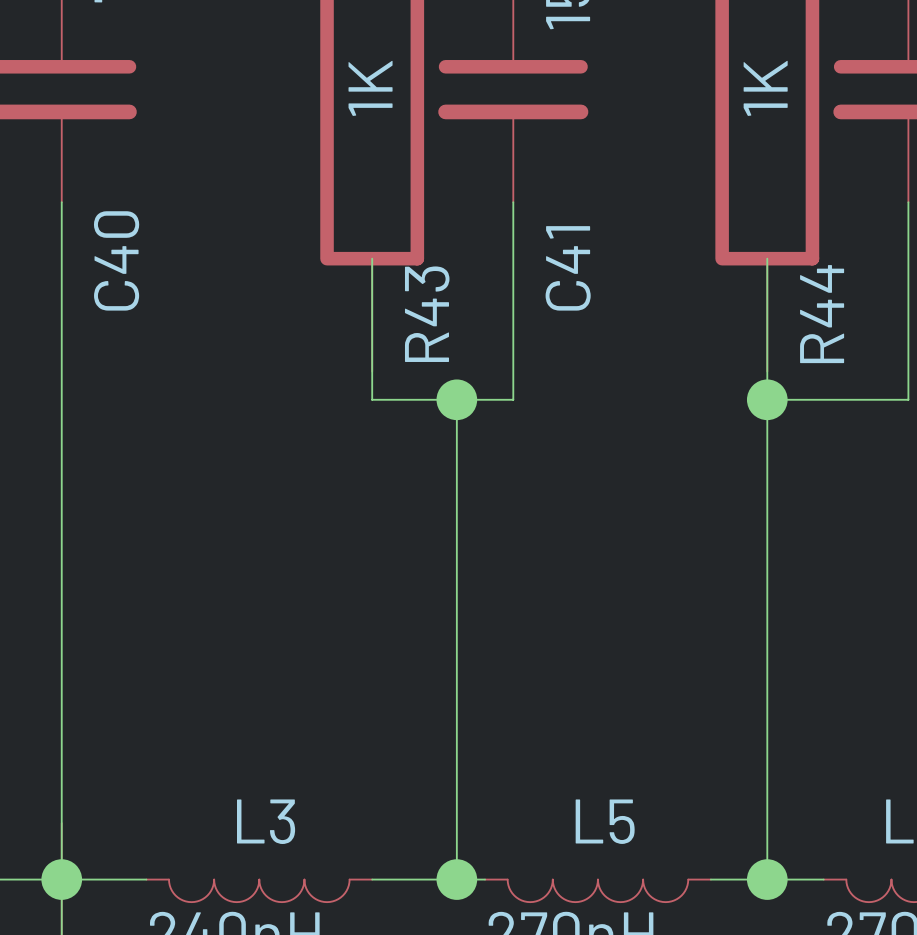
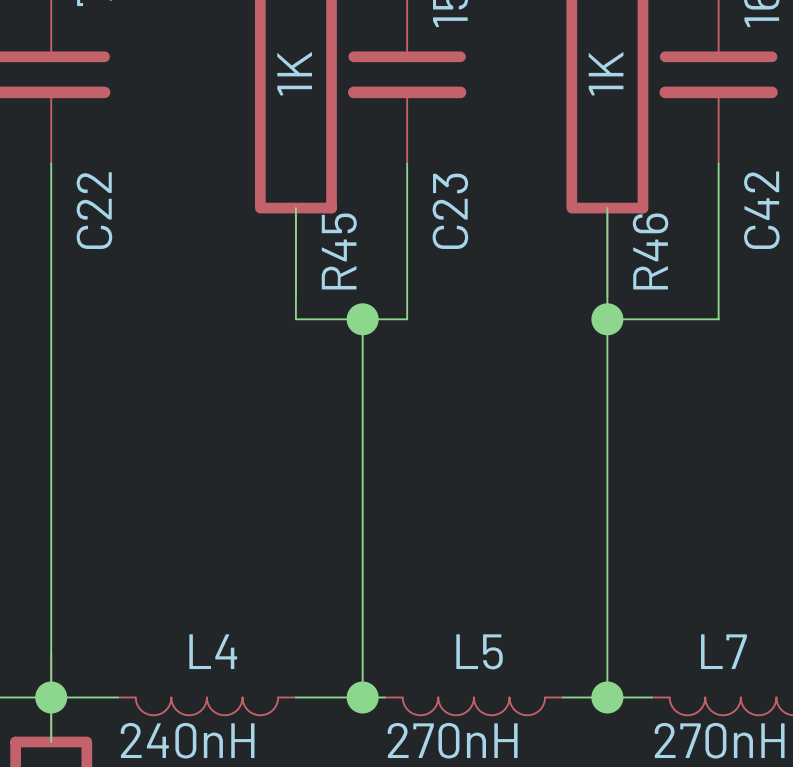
C40 name: C40 (116, 260) -> C22 (94, 210)
C41 name: C41 (568, 268) -> C23 (450, 211)
R43 name: R43 (427, 314) -> R45 (339, 251)
R44 name: R44 (822, 314) -> R46 (650, 251)
L3 name: L3 (266, 821) -> L4 (213, 651)

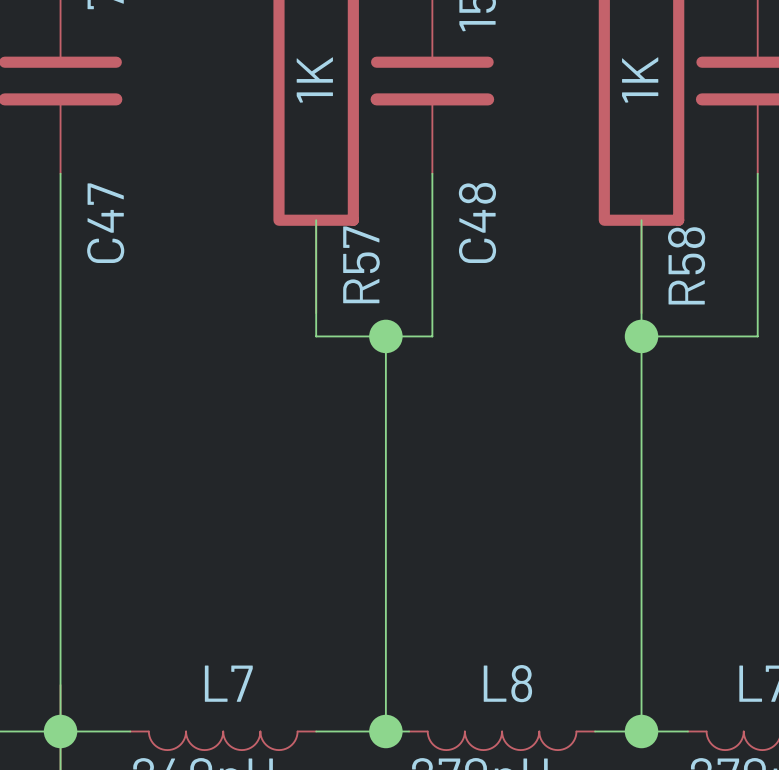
C22 name: C22 (94, 210) -> C47 (105, 223)
C23 name: C23 (450, 211) -> C48 (477, 222)
R45 name: R45 (339, 251) -> R57 (361, 264)
R46 name: R46 (650, 251) -> R58 (686, 265)
L4 name: L4 (213, 651) -> L7 (228, 683)
L5 name: L5 (479, 651) -> L8 (507, 683)

